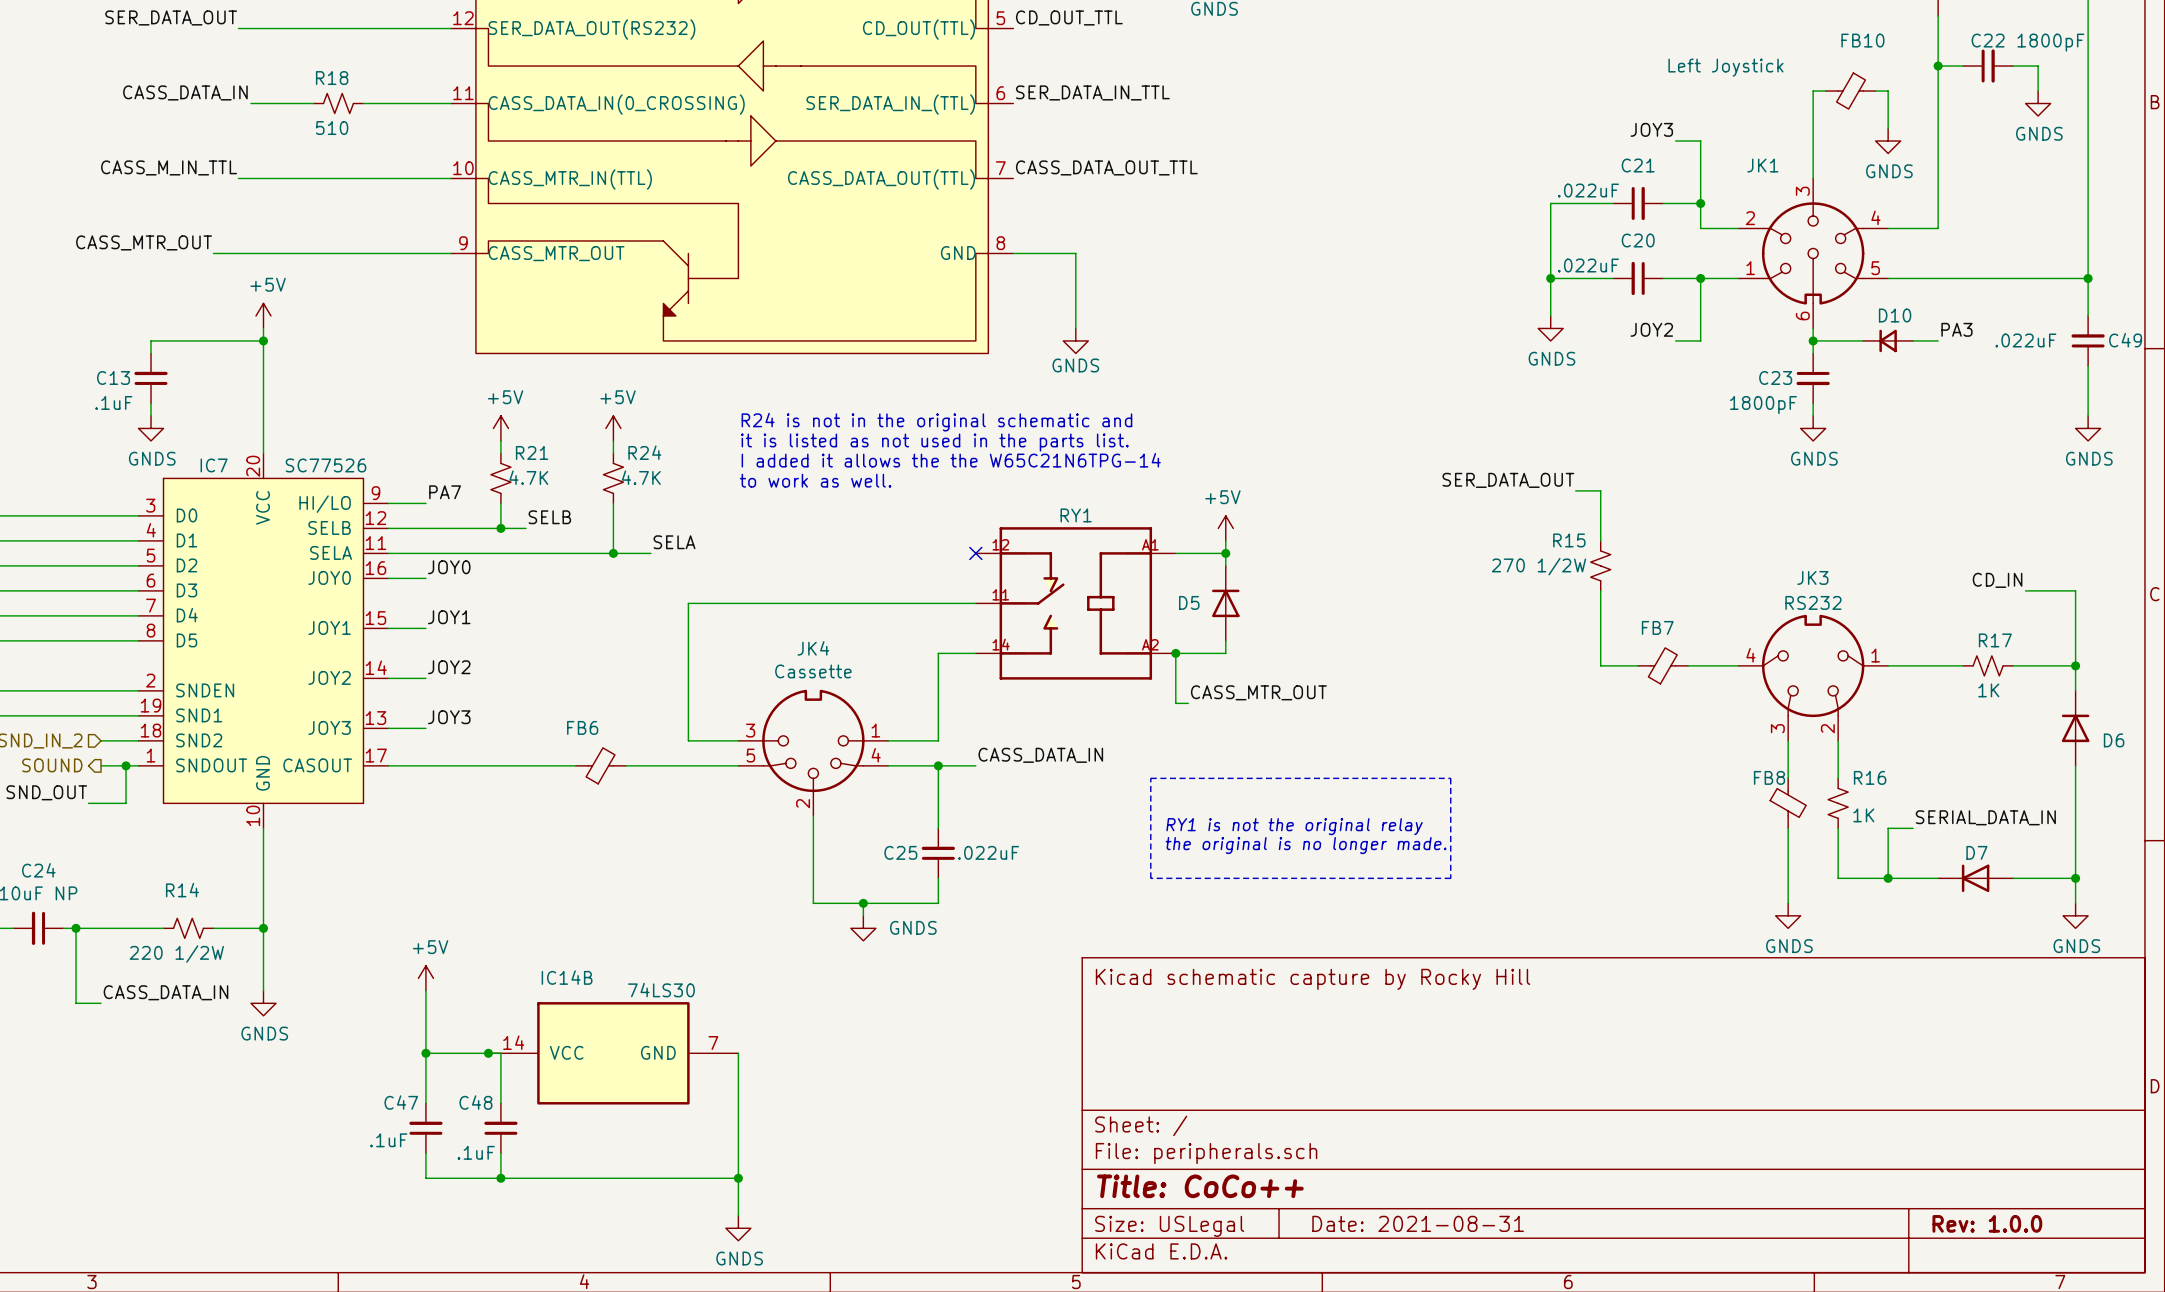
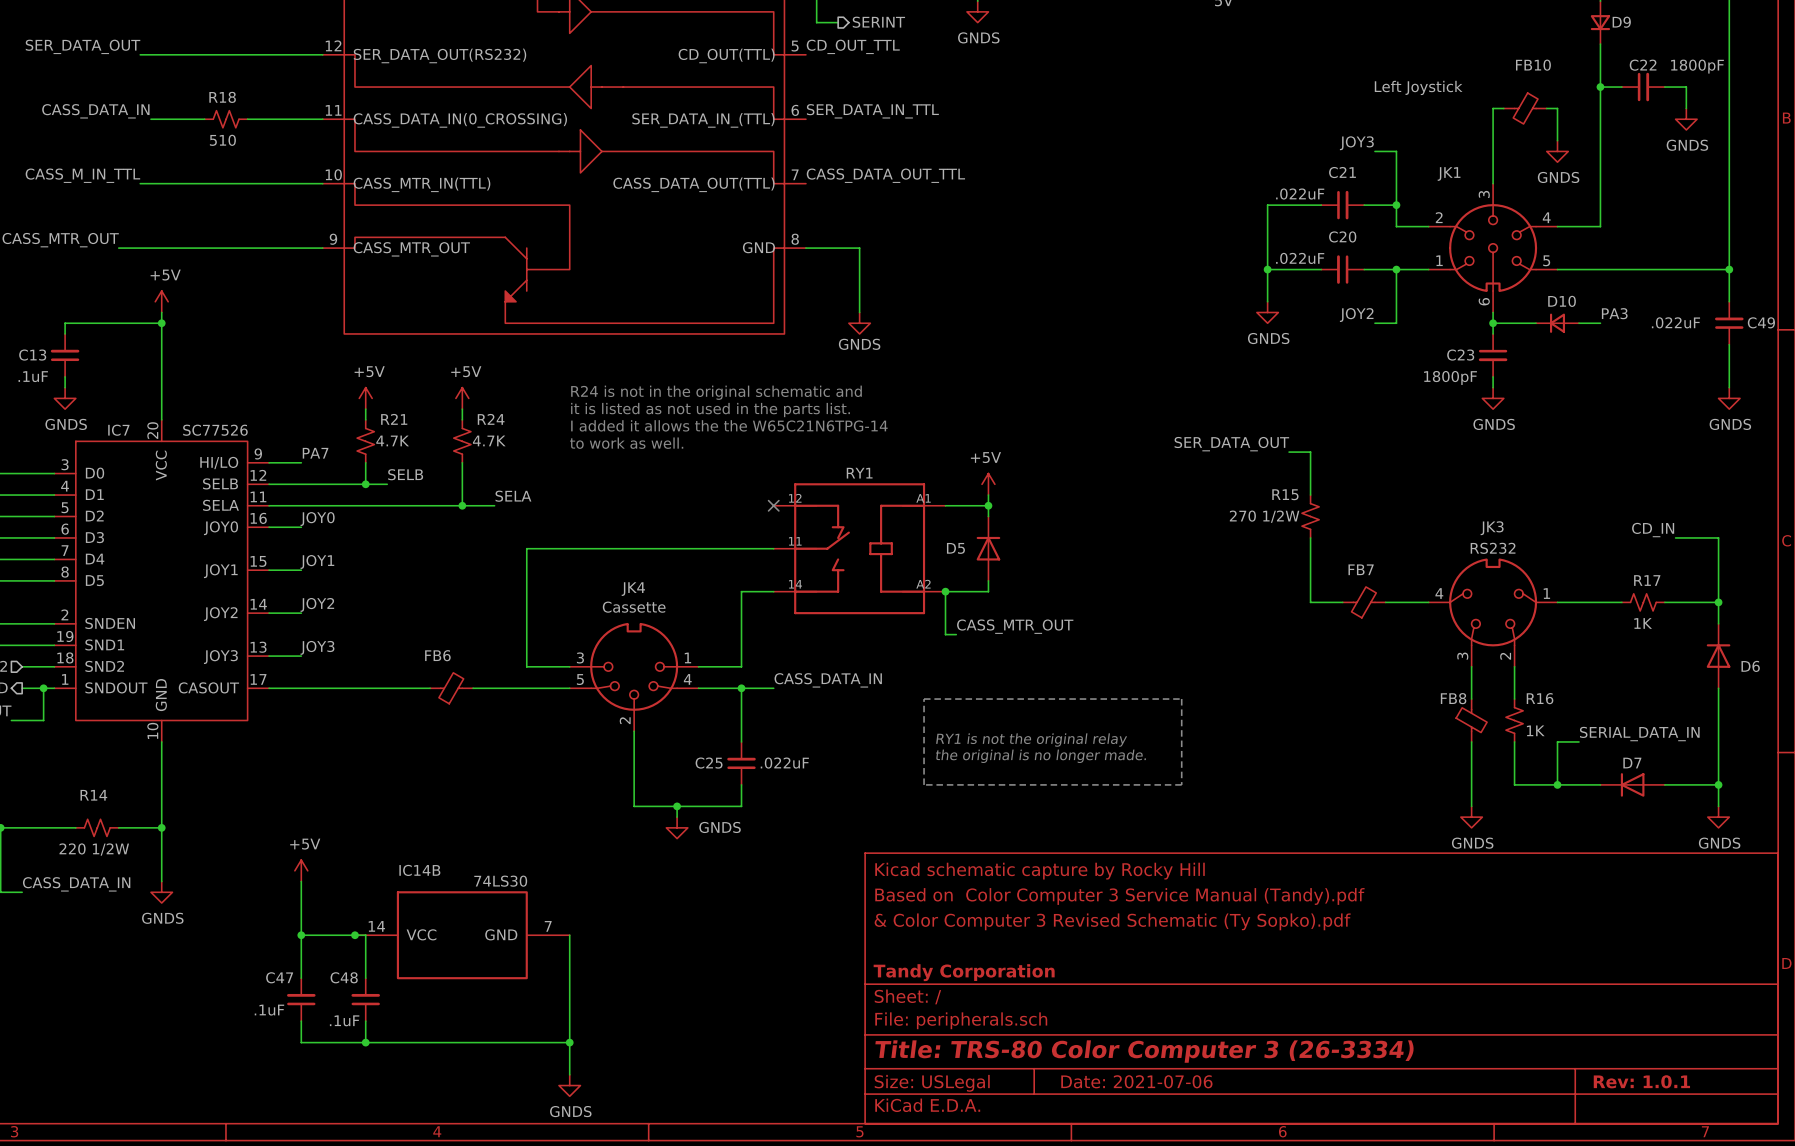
title block: none -> Based on Color Computer 3 Service Manual (Tandy).pdf (1119, 896)
title block: none -> & Color Computer 3 Revised Schematic (Ty Sopko).pdf (1112, 921)
title block: none -> Tandy Corporation (964, 972)
title block: Title: CoCo++ (1200, 1186) -> Title: TRS-80 Color Computer 3 (26-3334) (1144, 1051)
title block: Date: 2021-08-31 (1418, 1223) -> Date: 2021-07-06 (1136, 1081)
title block: Rev: 1.0.0 (1987, 1223) -> Rev: 1.0.1 (1641, 1081)

